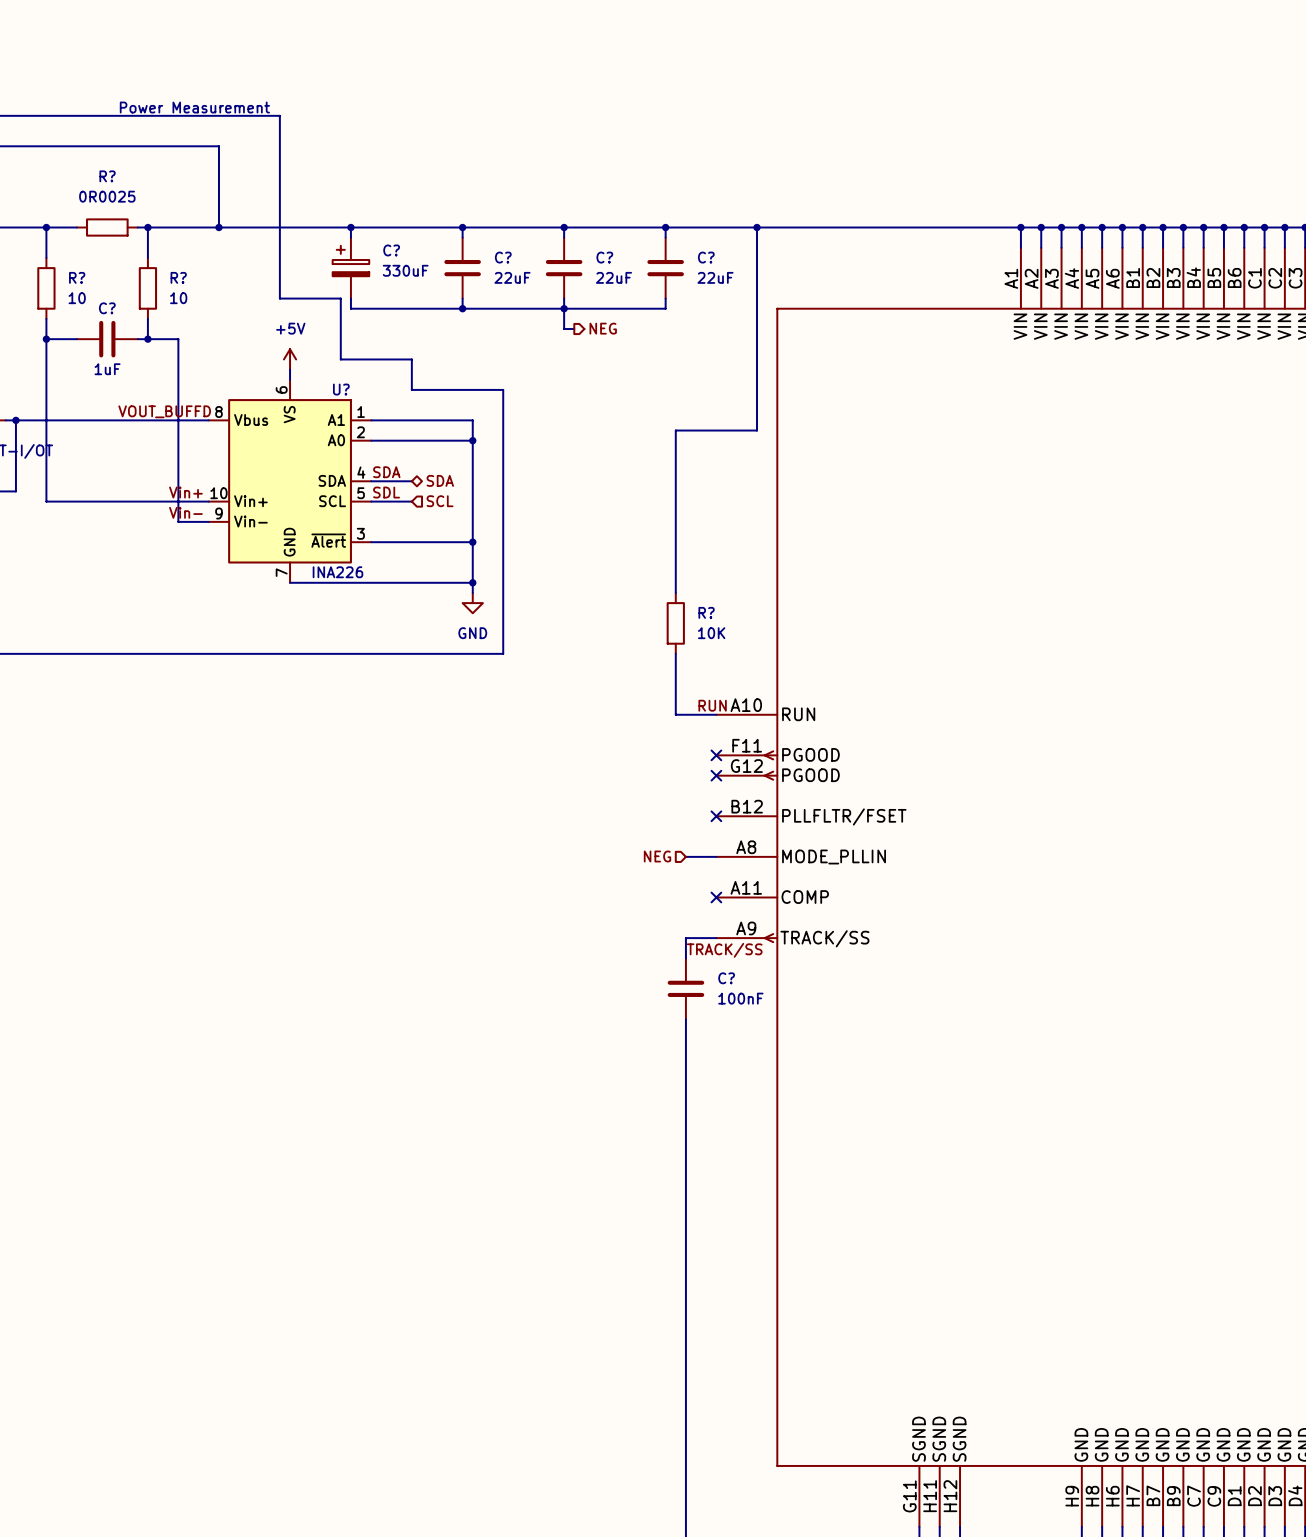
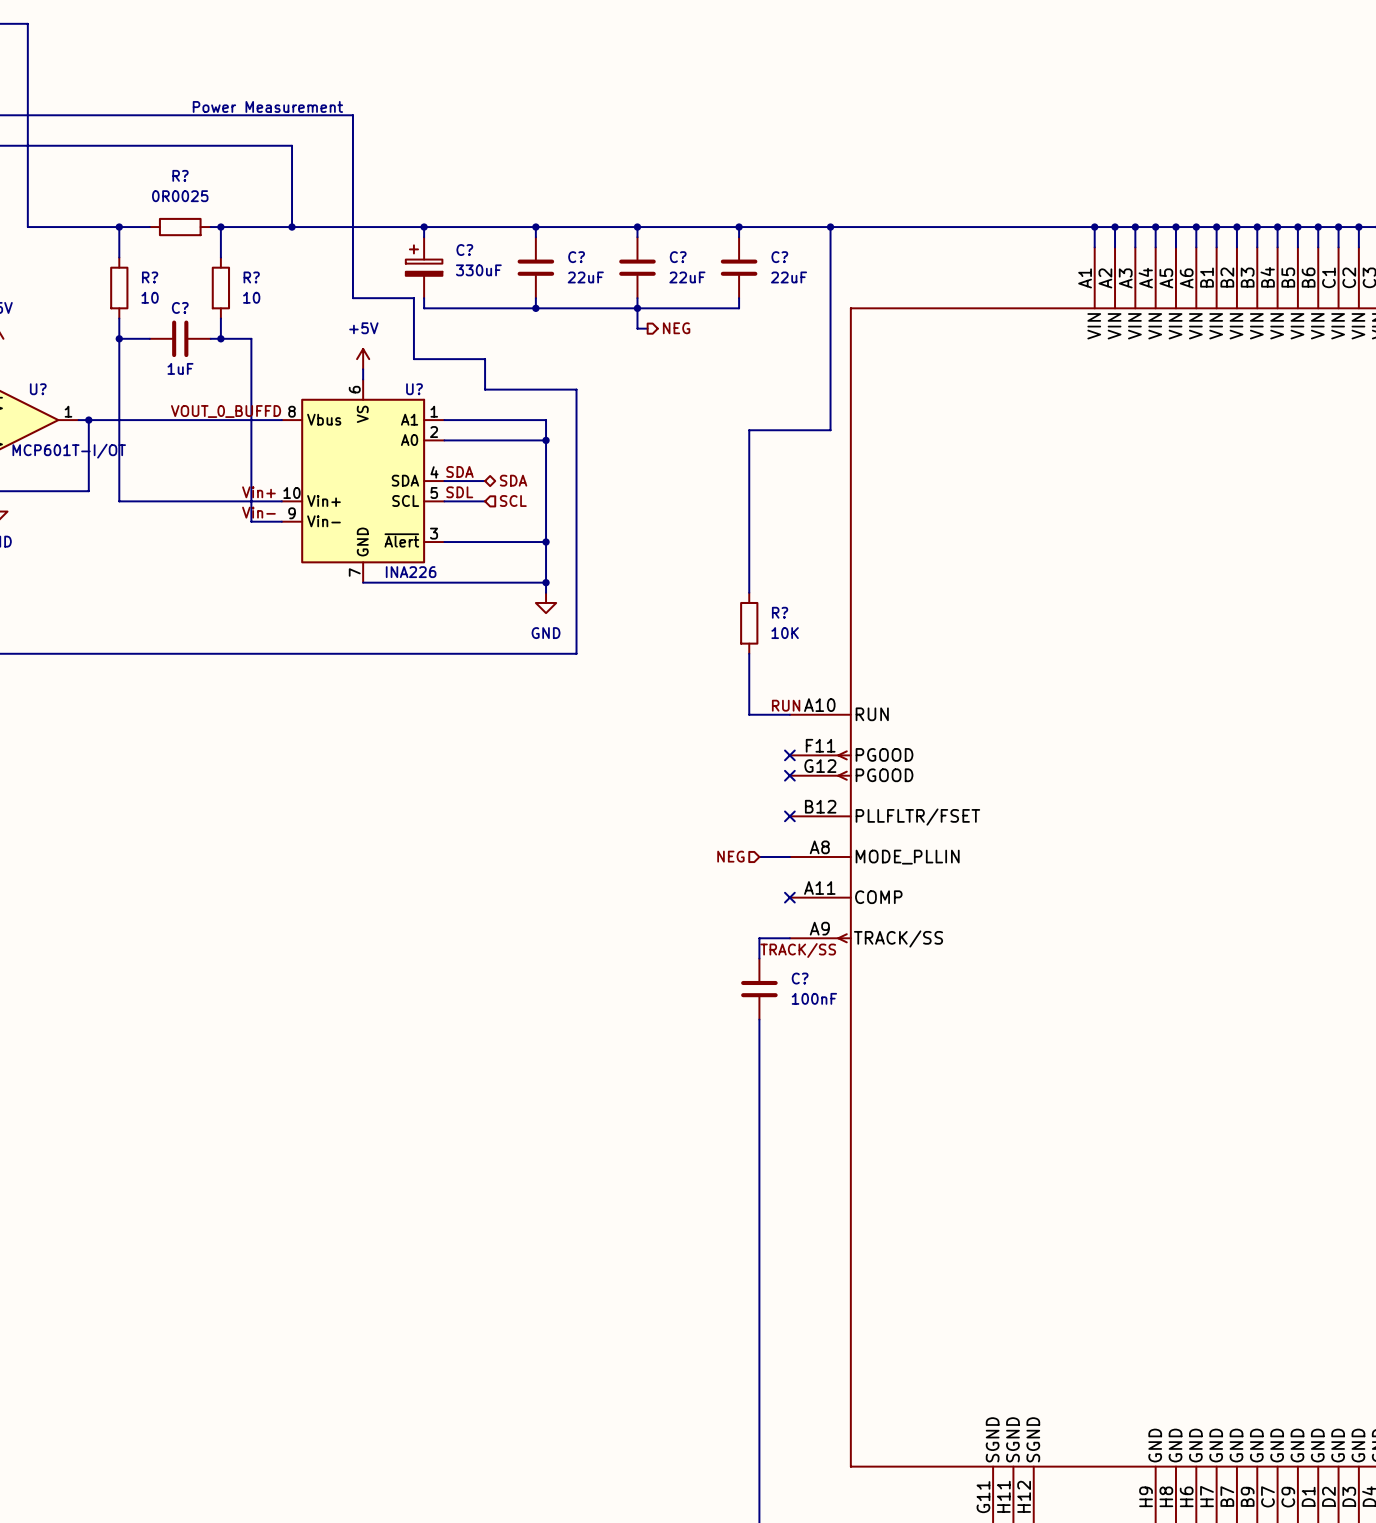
label: VOUT_BUFFD (164, 411) -> VOUT_0_BUFFD (226, 411)

